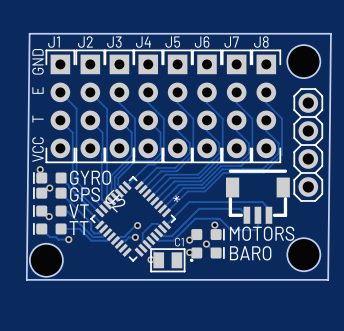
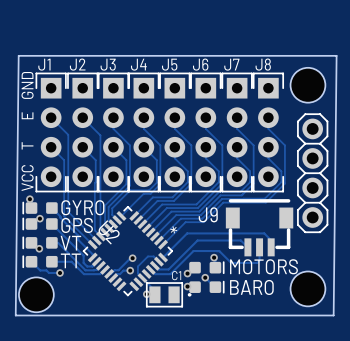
text: none -> J9 (208, 214)

